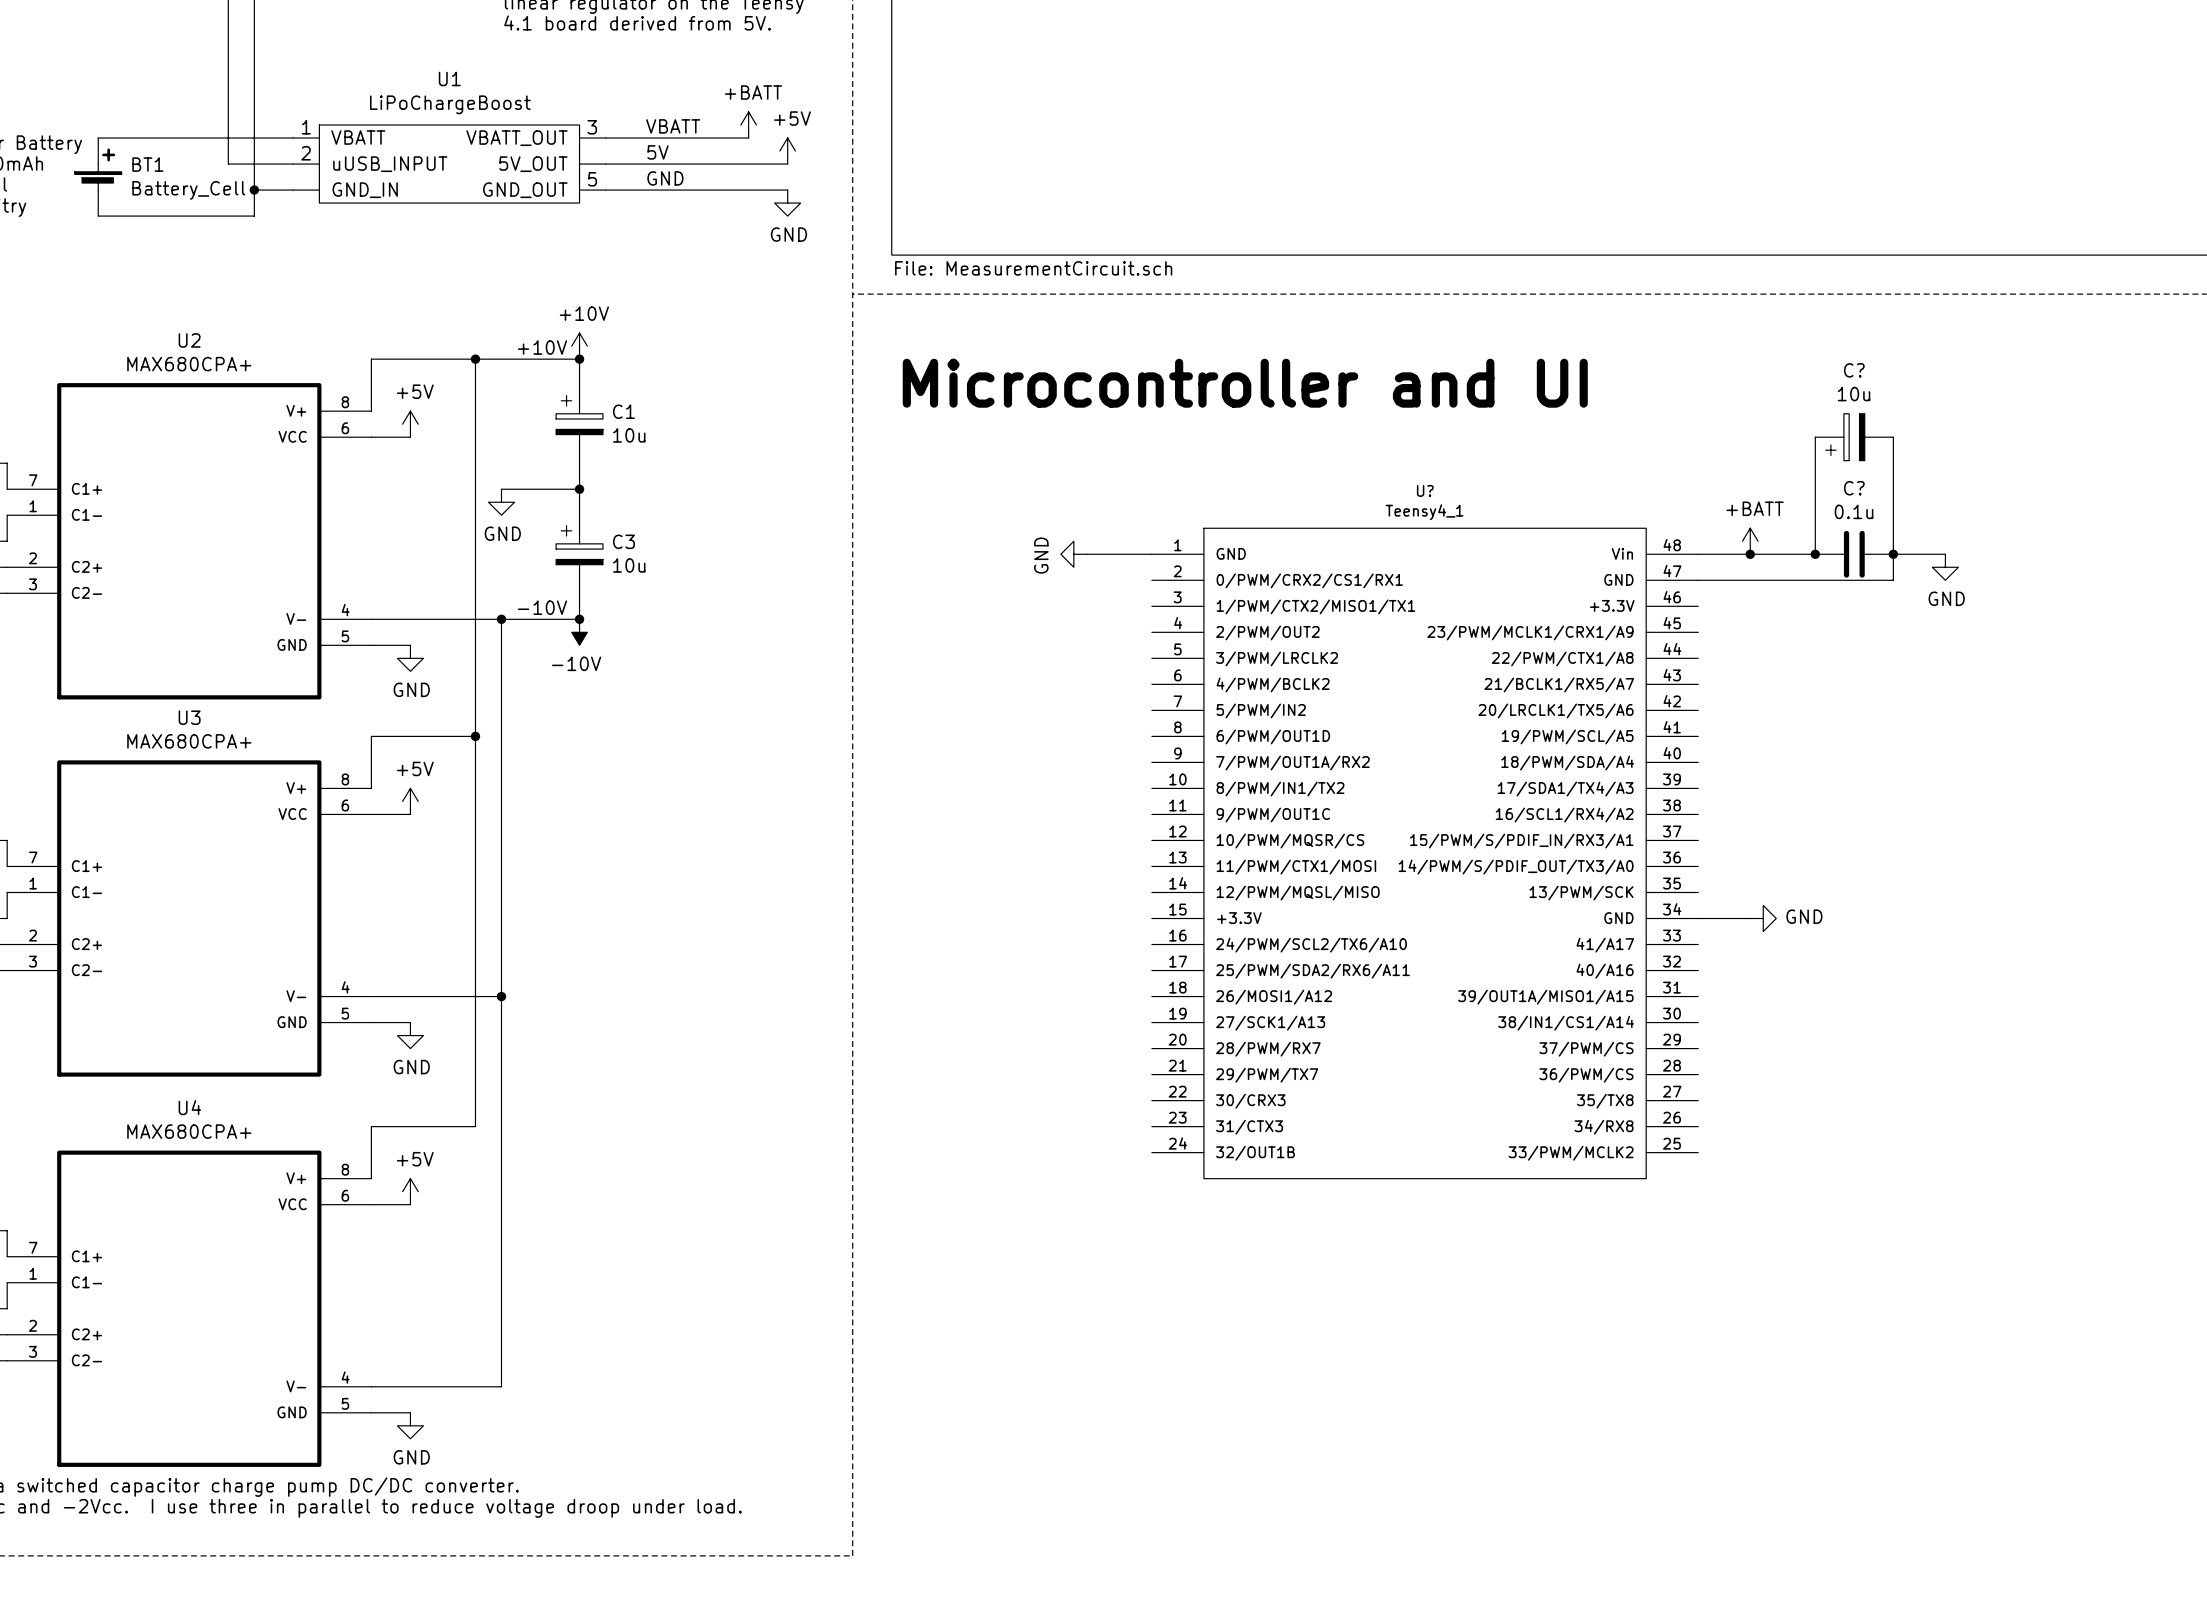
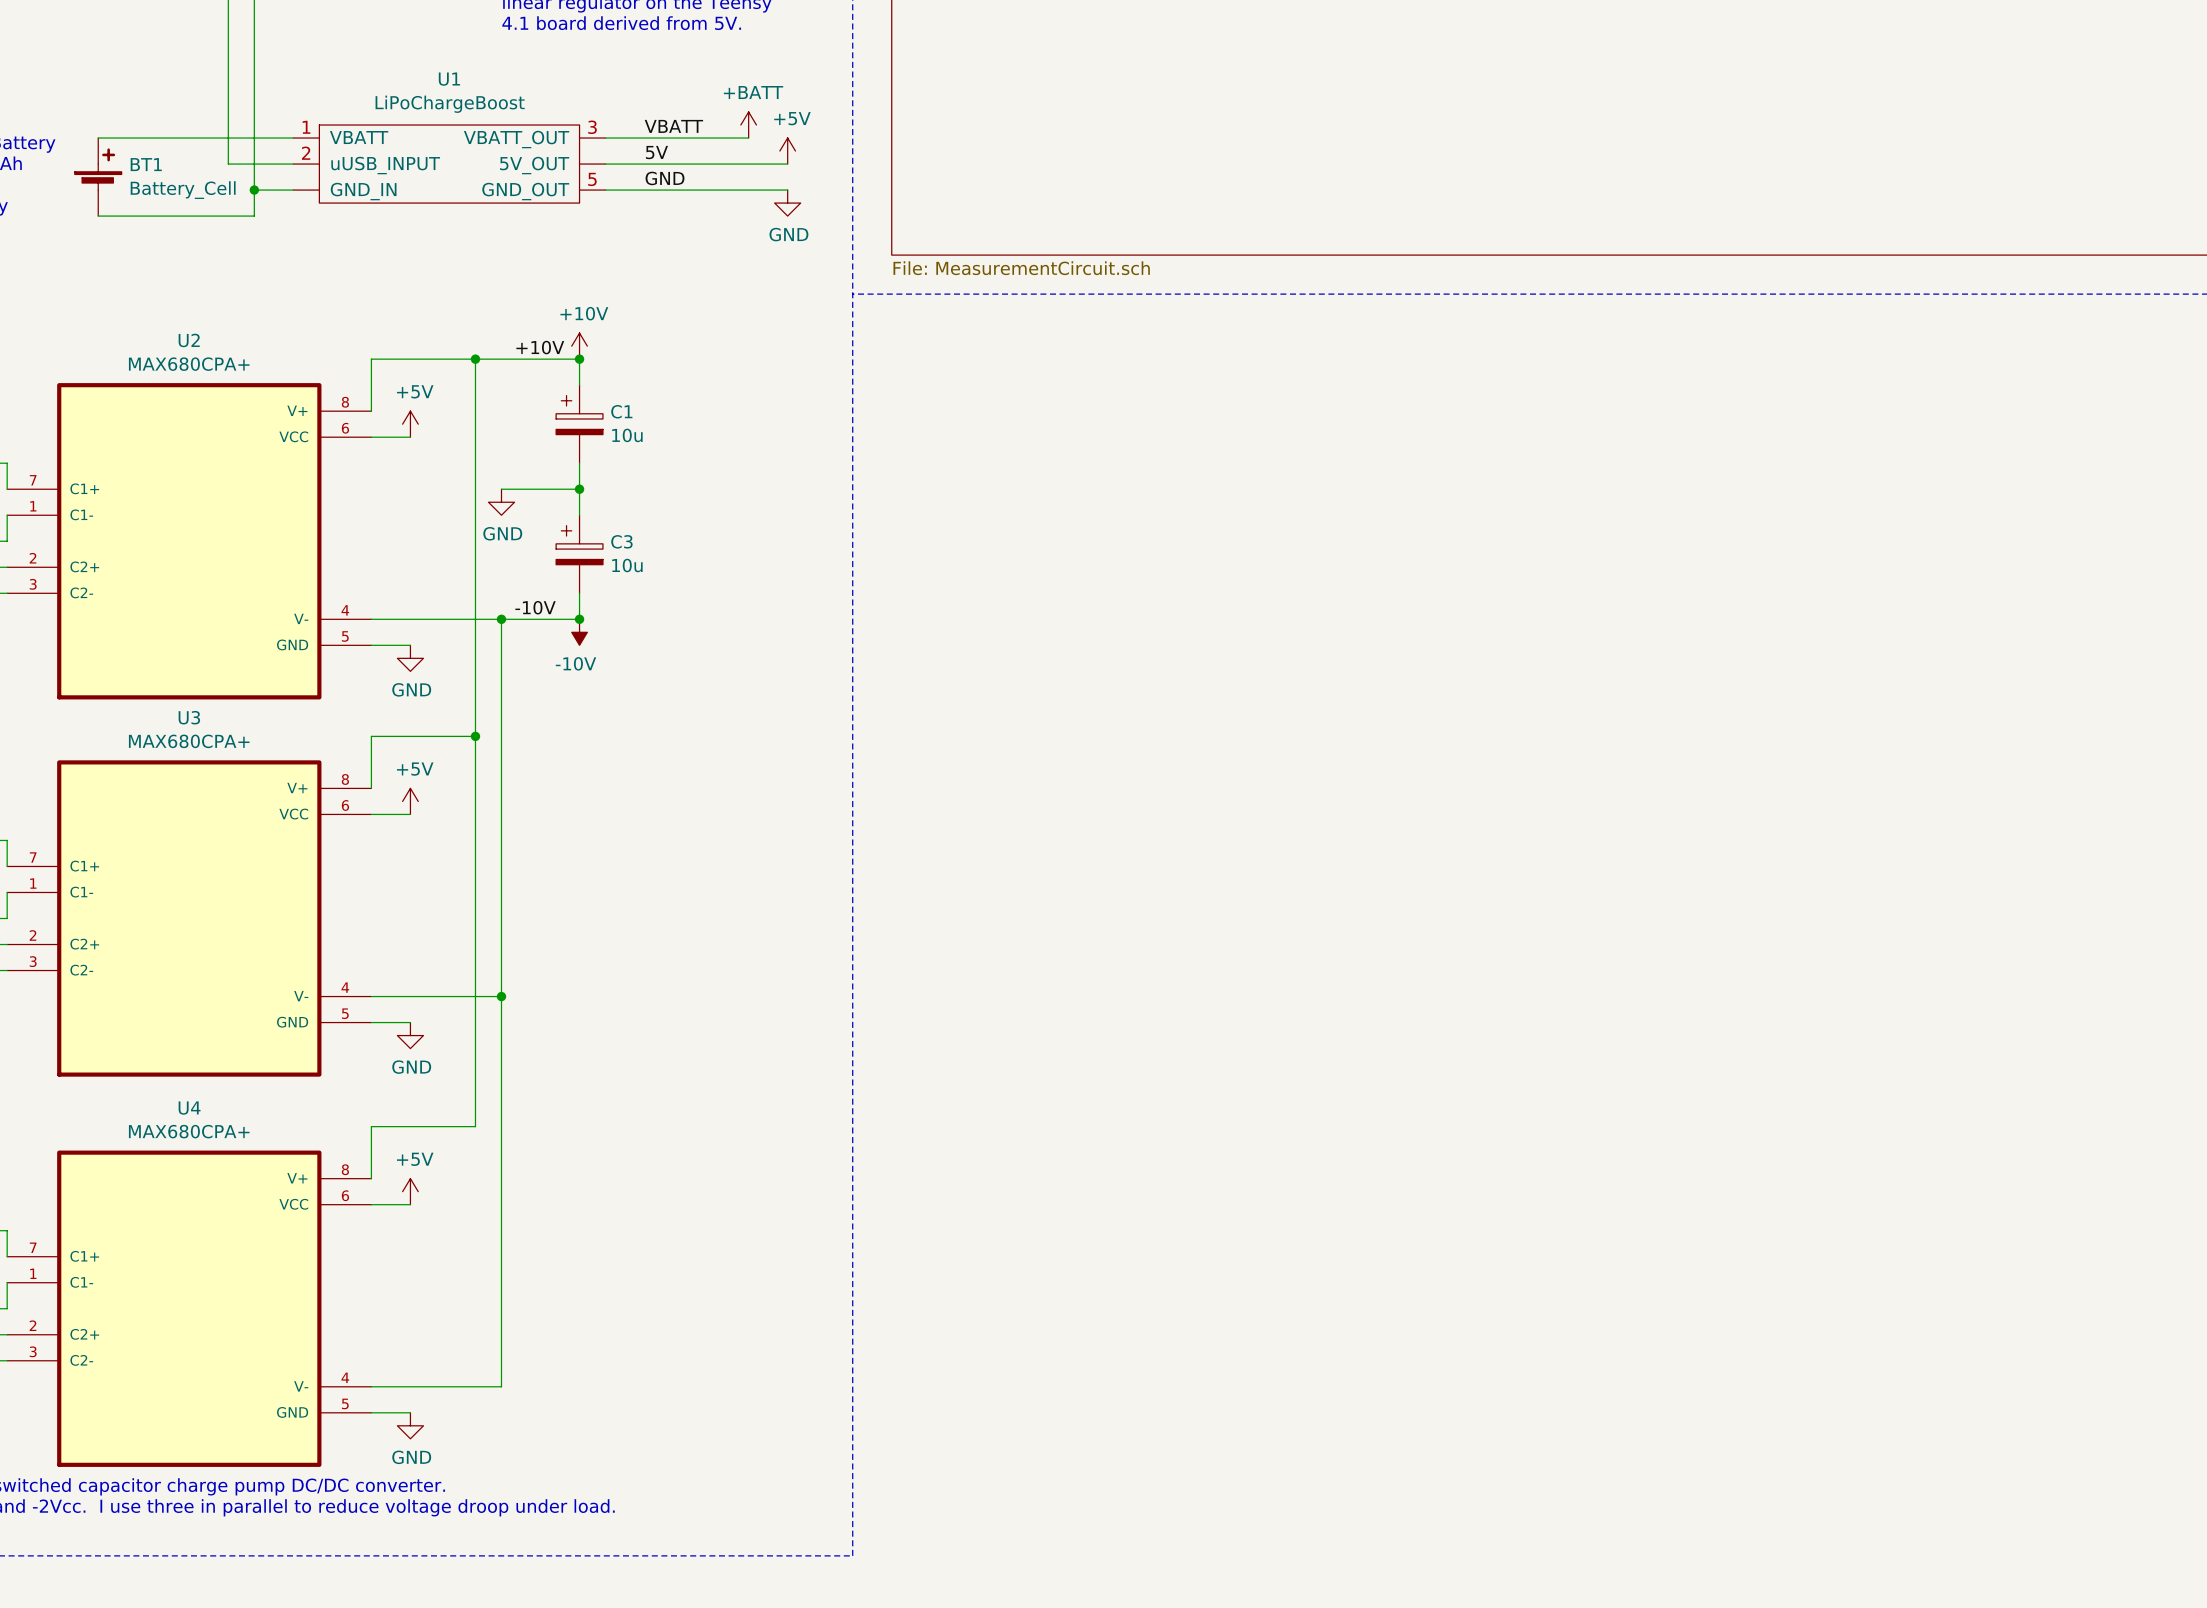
text: Microcontroller and UI (1245, 383) -> none
wire: (1815, 437) (1815, 554) (1698, 554) -> none
C?: 10u (1854, 437) -> none
wire: (1893, 437) (1893, 580) (1698, 580) -> none
power symbol: +BATT (1750, 541) -> none
power symbol: GND (1073, 554) -> none
wire: (1086, 554) (1151, 554) -> none
junction: (1750, 554) -> none
junction: (1815, 554) -> none
C?: 0.1u (1854, 554) -> none
wire: (1893, 554) (1945, 554) -> none
junction: (1893, 554) -> none
power symbol: GND (1945, 567) -> none
U?: Teensy4_1 (1425, 853) -> none
wire: (1698, 918) (1750, 918) -> none
power symbol: GND (1763, 918) -> none

